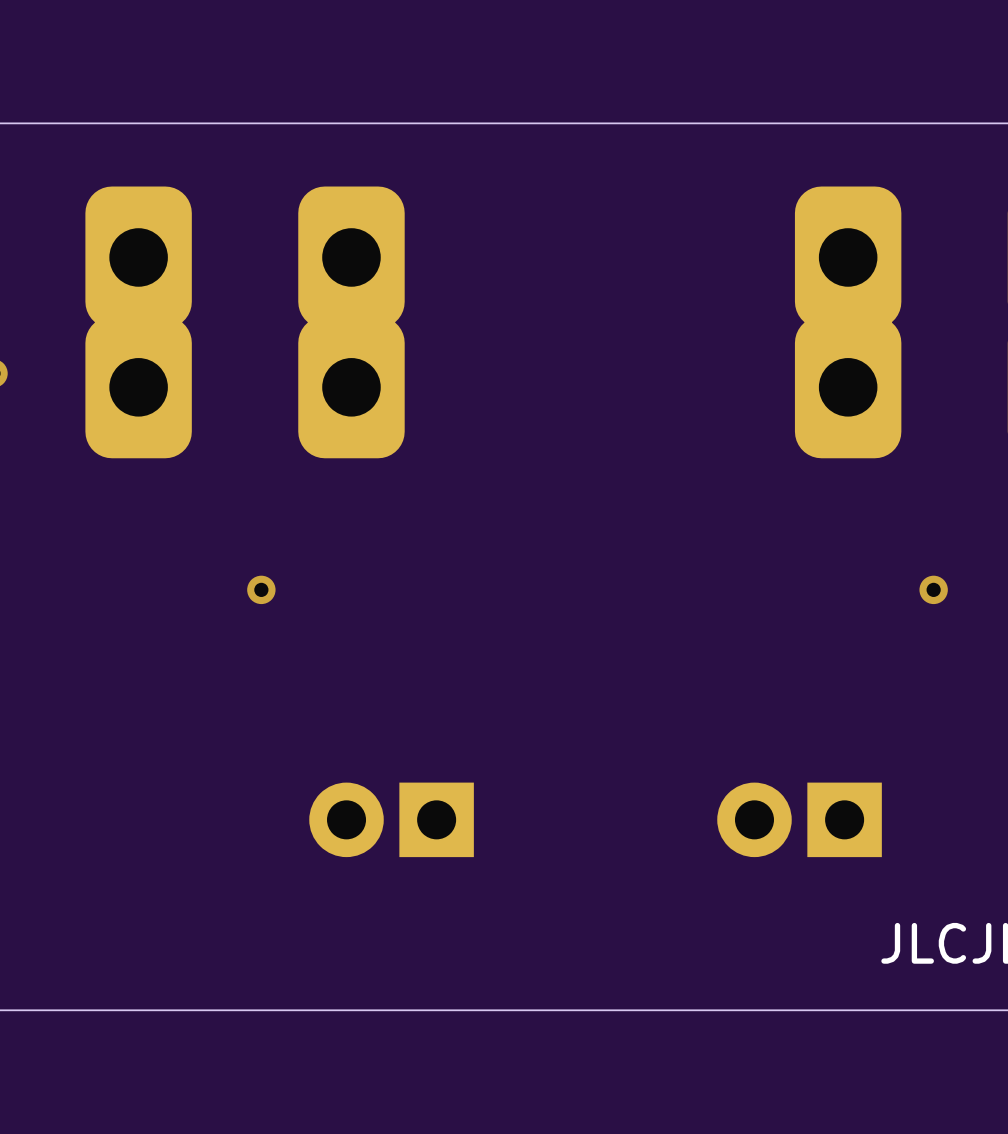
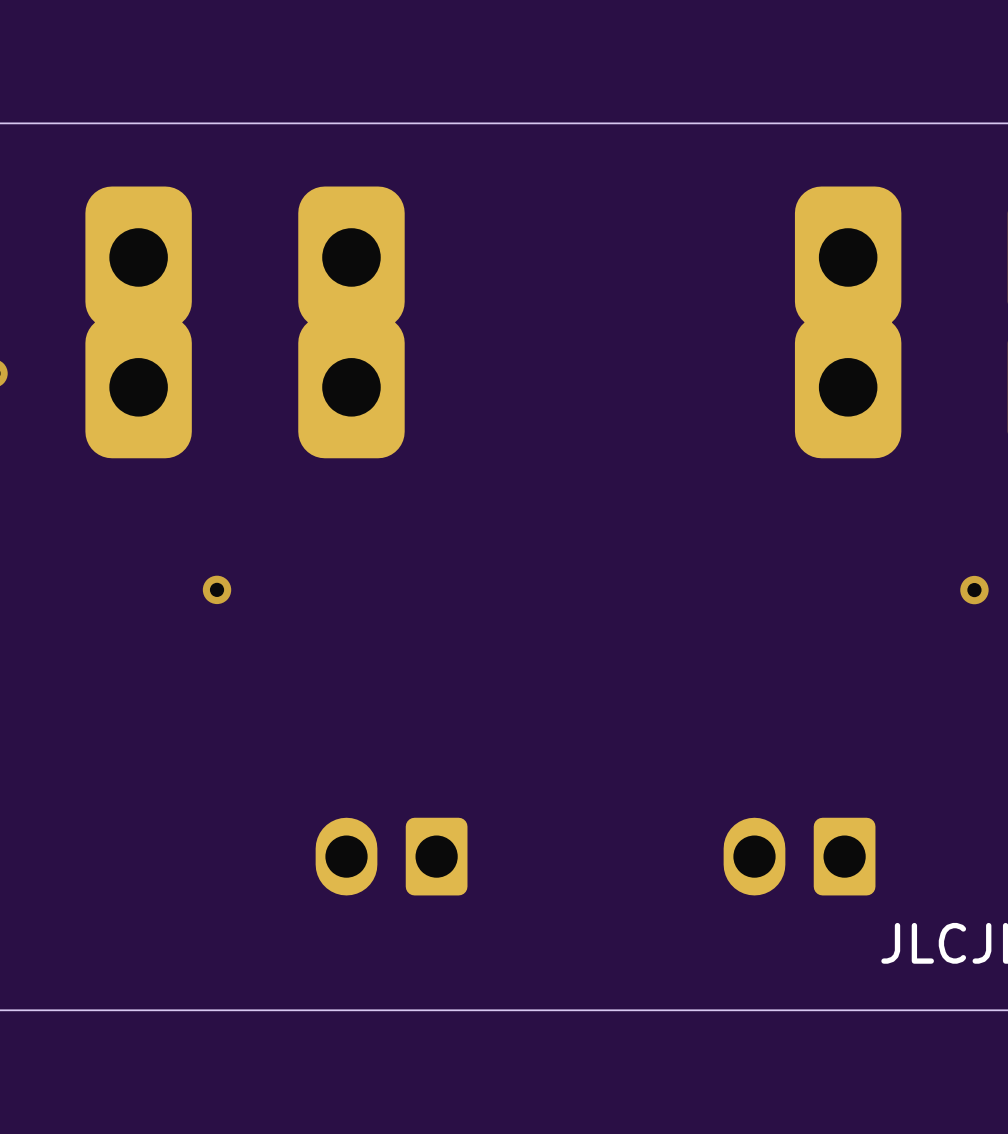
via position: (261, 589) -> (217, 589)
via position: (933, 589) -> (974, 590)
part: (391, 819) -> none
part: (799, 819) -> none
part: none -> (391, 856)
part: none -> (799, 856)

